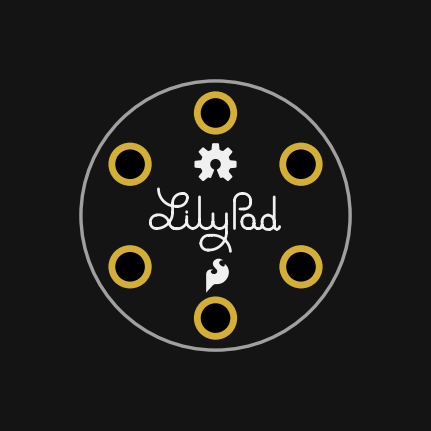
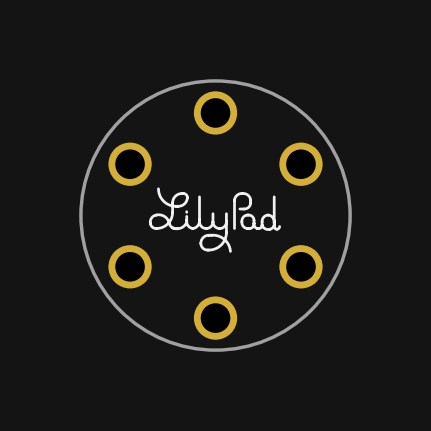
drawing: [194, 143, 237, 182] -> none
drawing: [206, 258, 229, 293] -> none

